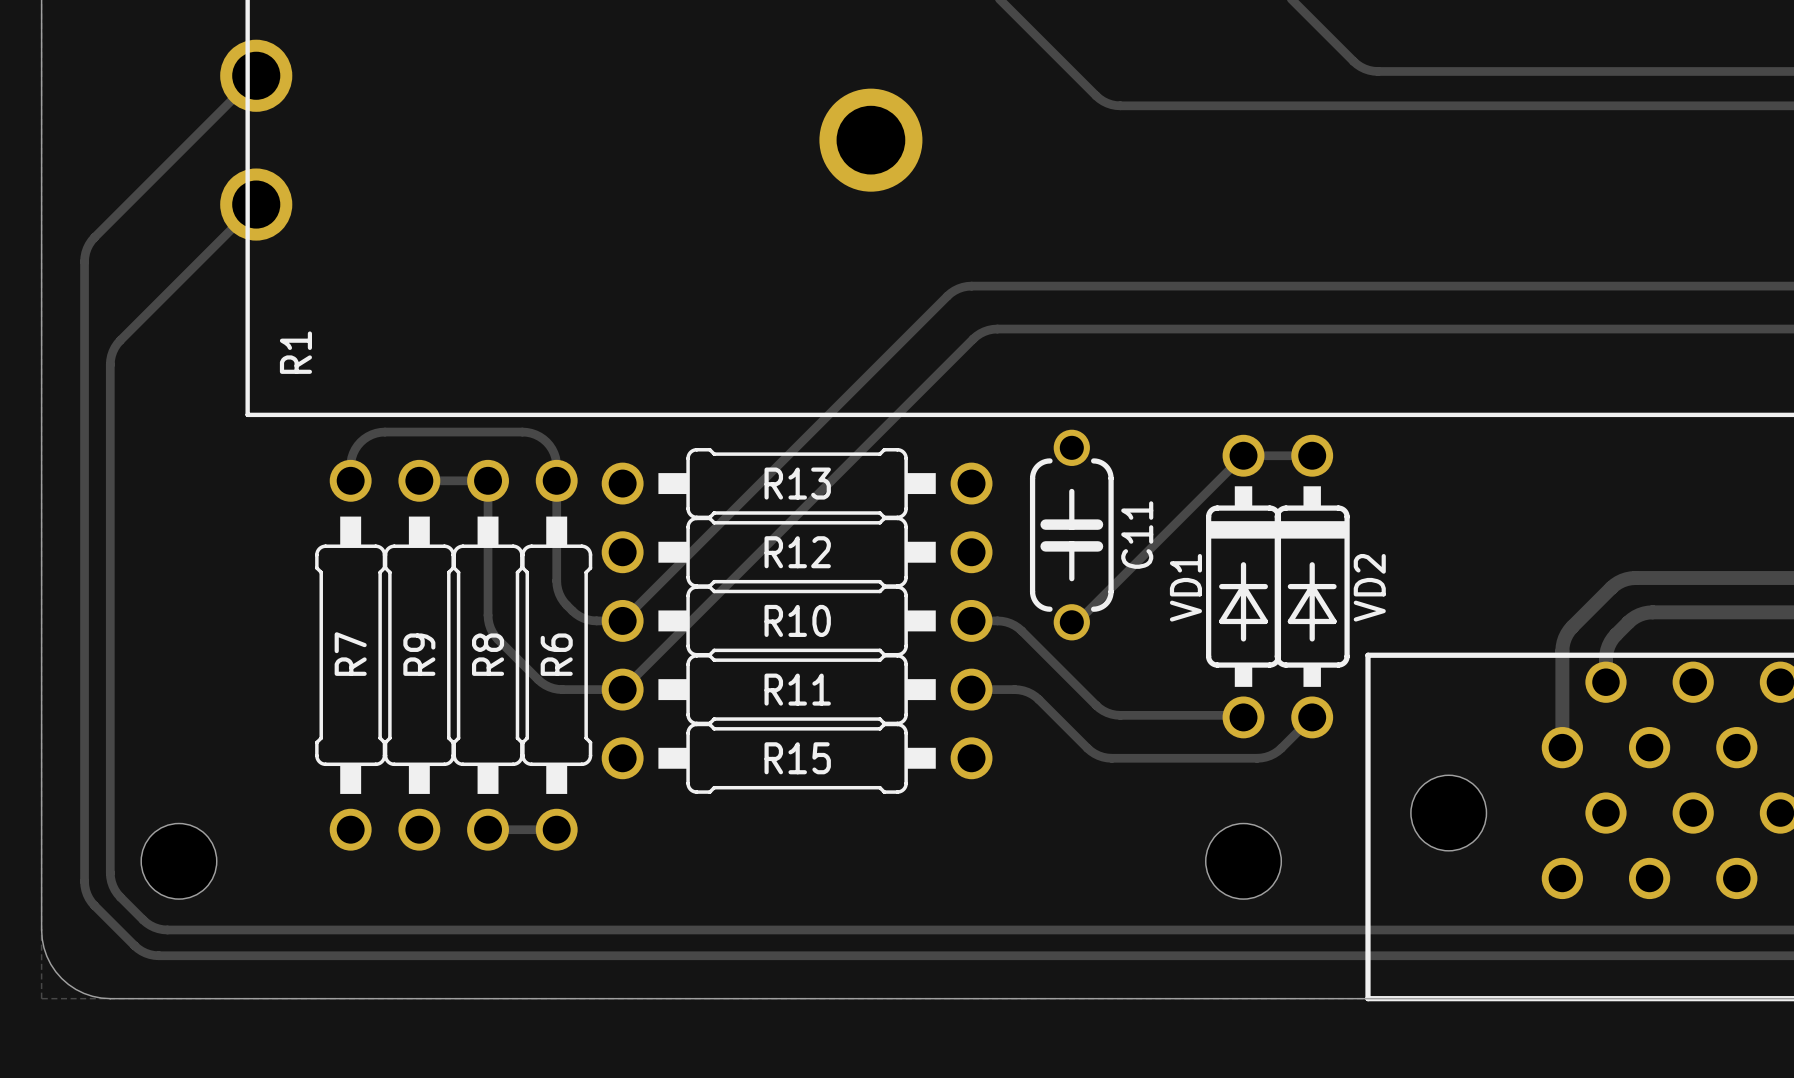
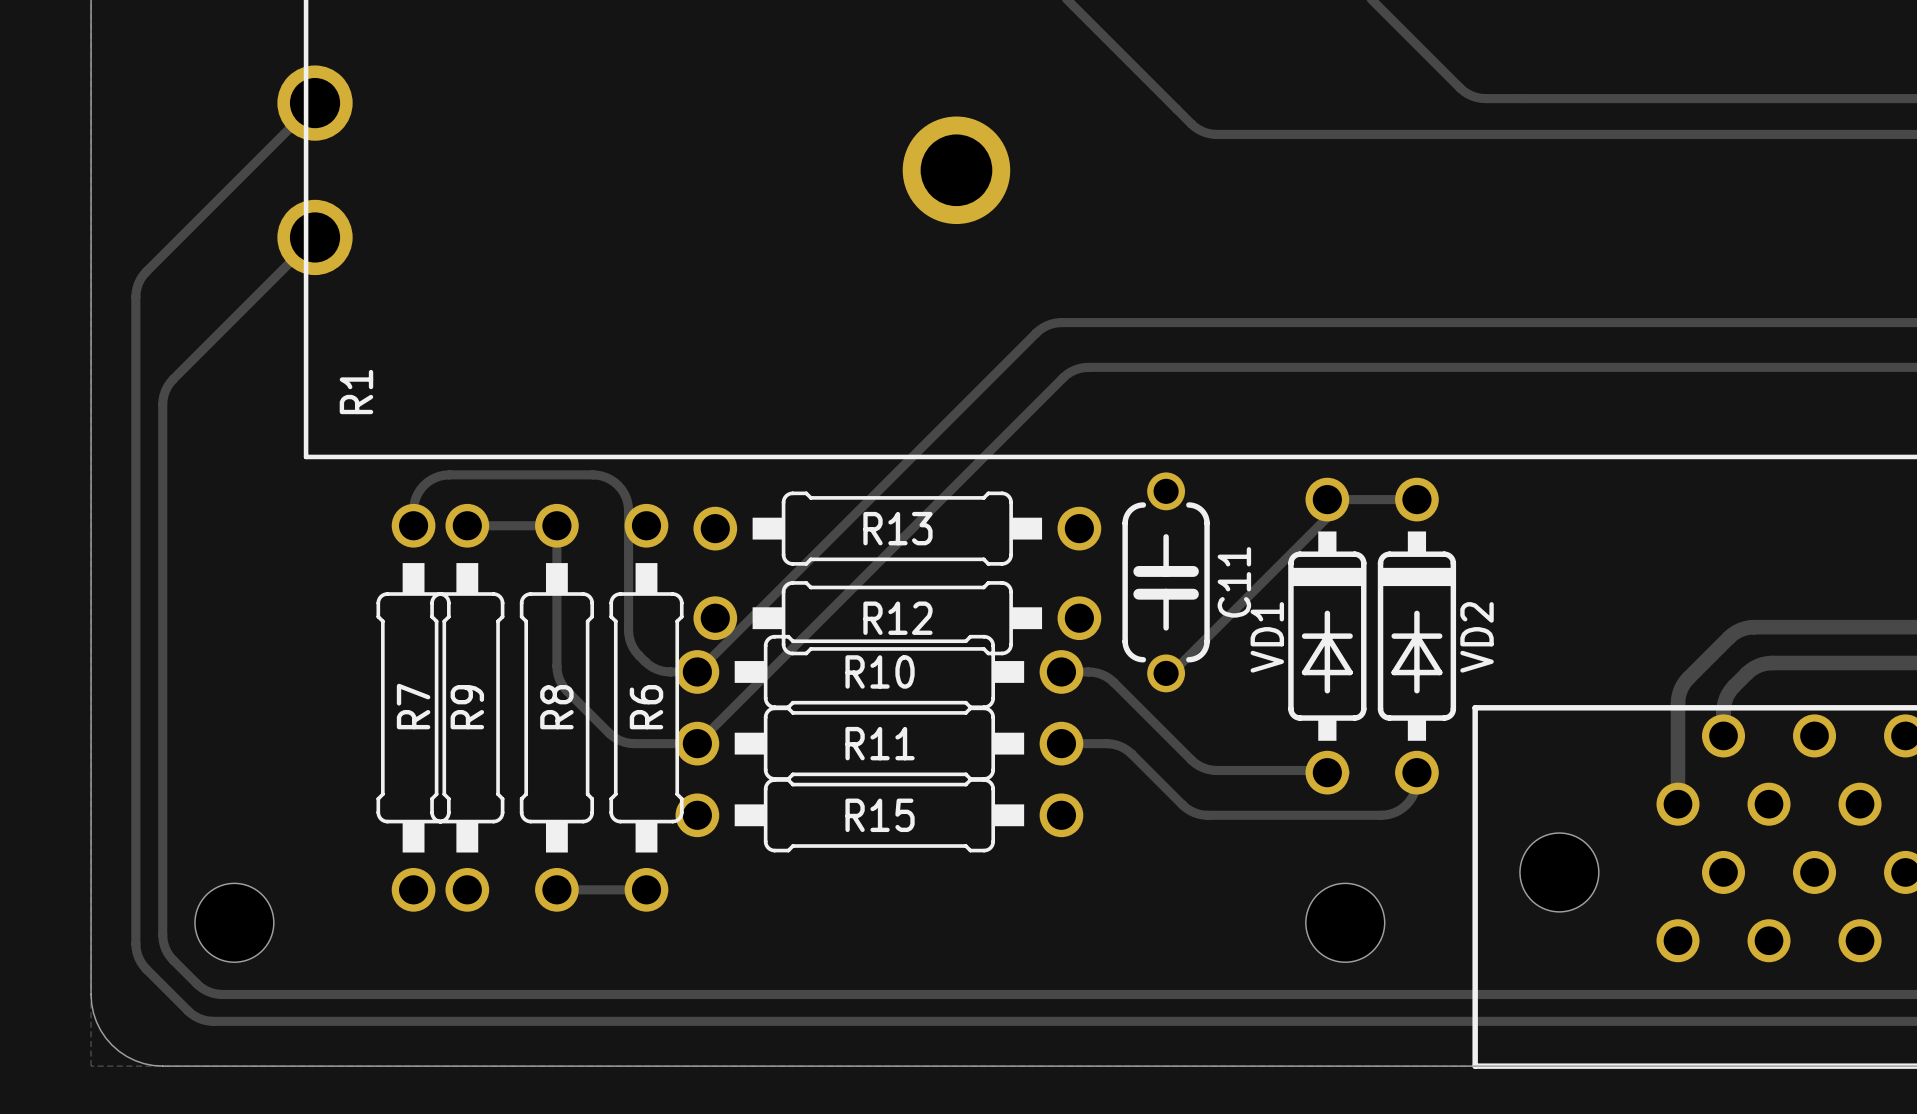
R13 position: (797, 483) -> (897, 528)
R12 position: (797, 552) -> (897, 618)
VD1 position: (1243, 586) -> (1327, 636)
R9 position: (419, 655) -> (467, 707)
R6 position: (556, 655) -> (646, 707)
track: (1312, 717) (1278, 751) (1265, 757) (1257, 758) -> (1416, 772) (1414, 793) (1402, 807) (1385, 814) (1359, 815)

